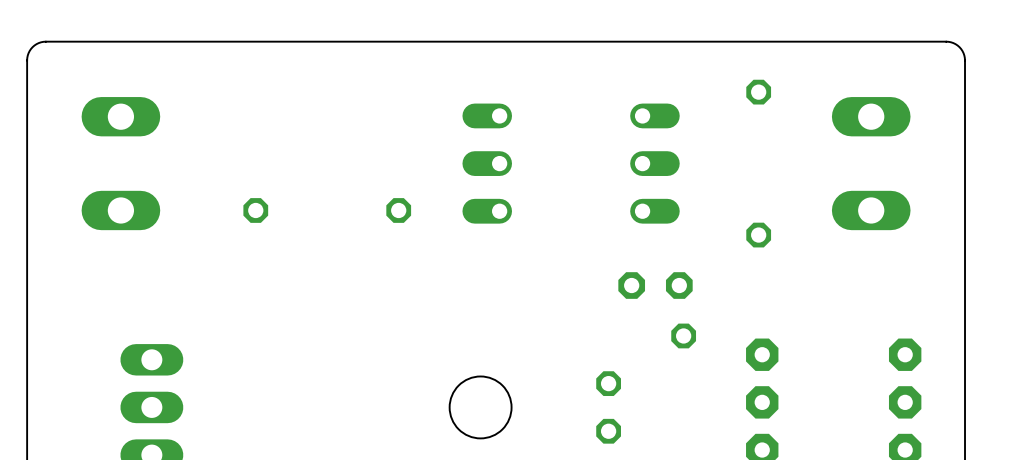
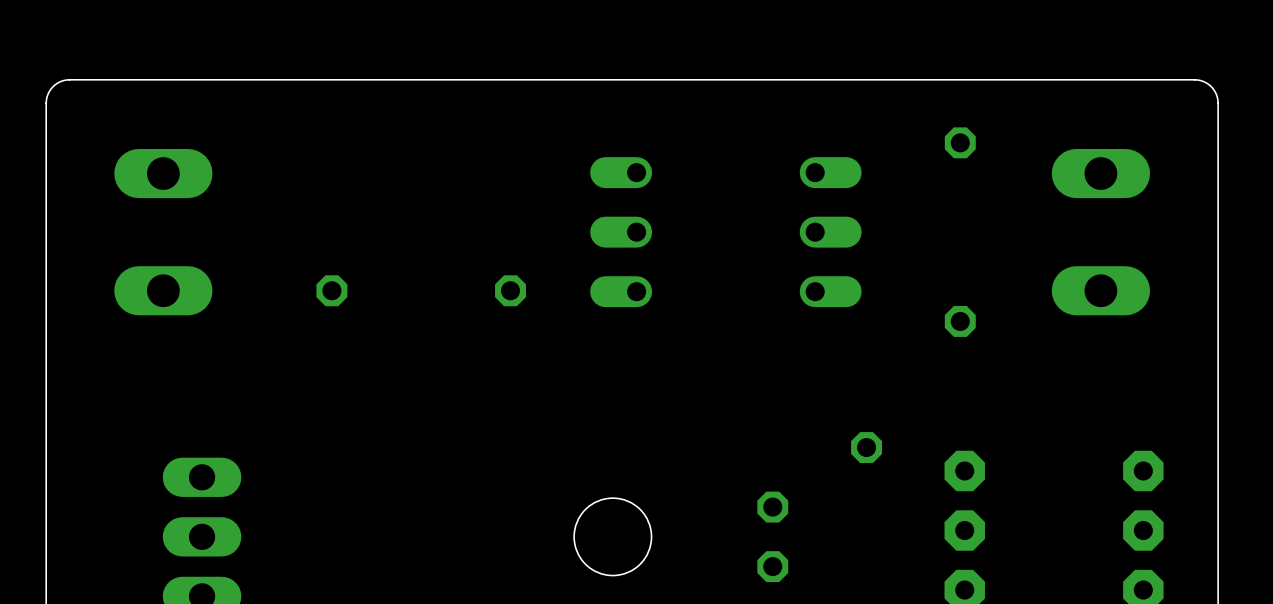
part: (655, 285) -> none

